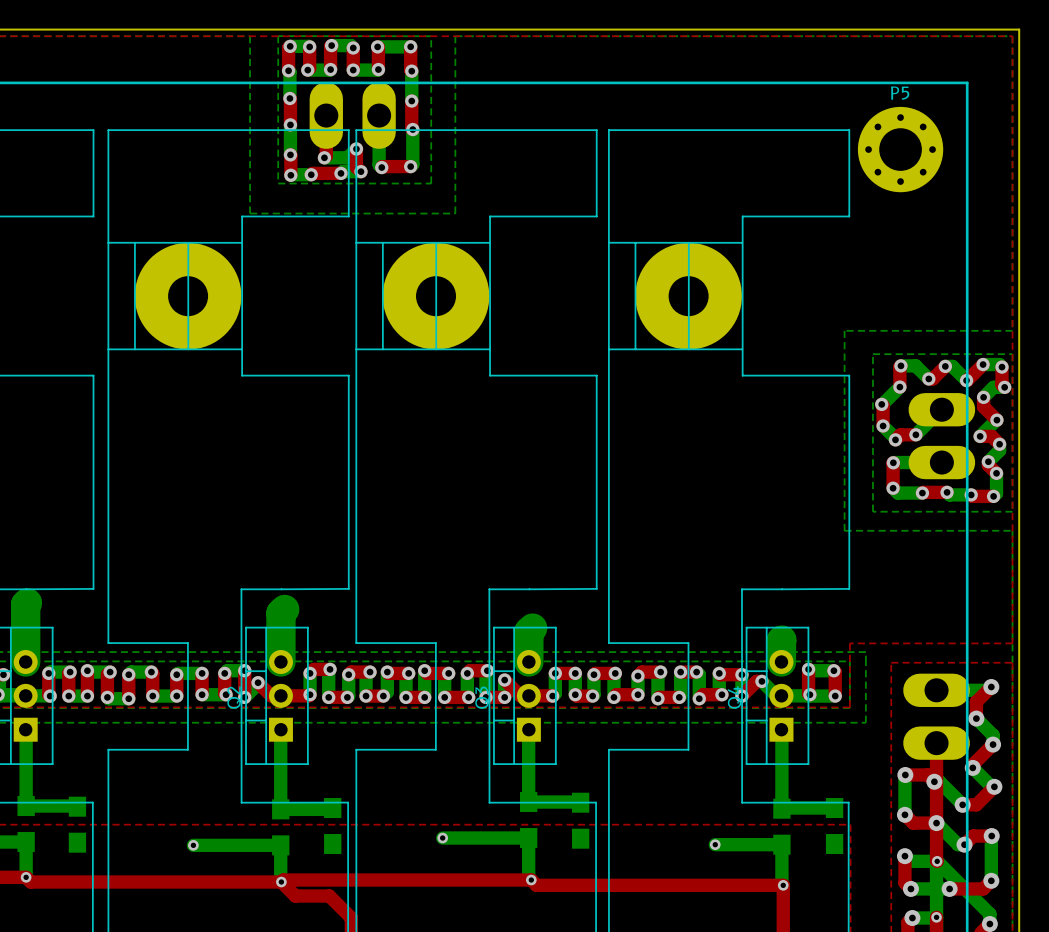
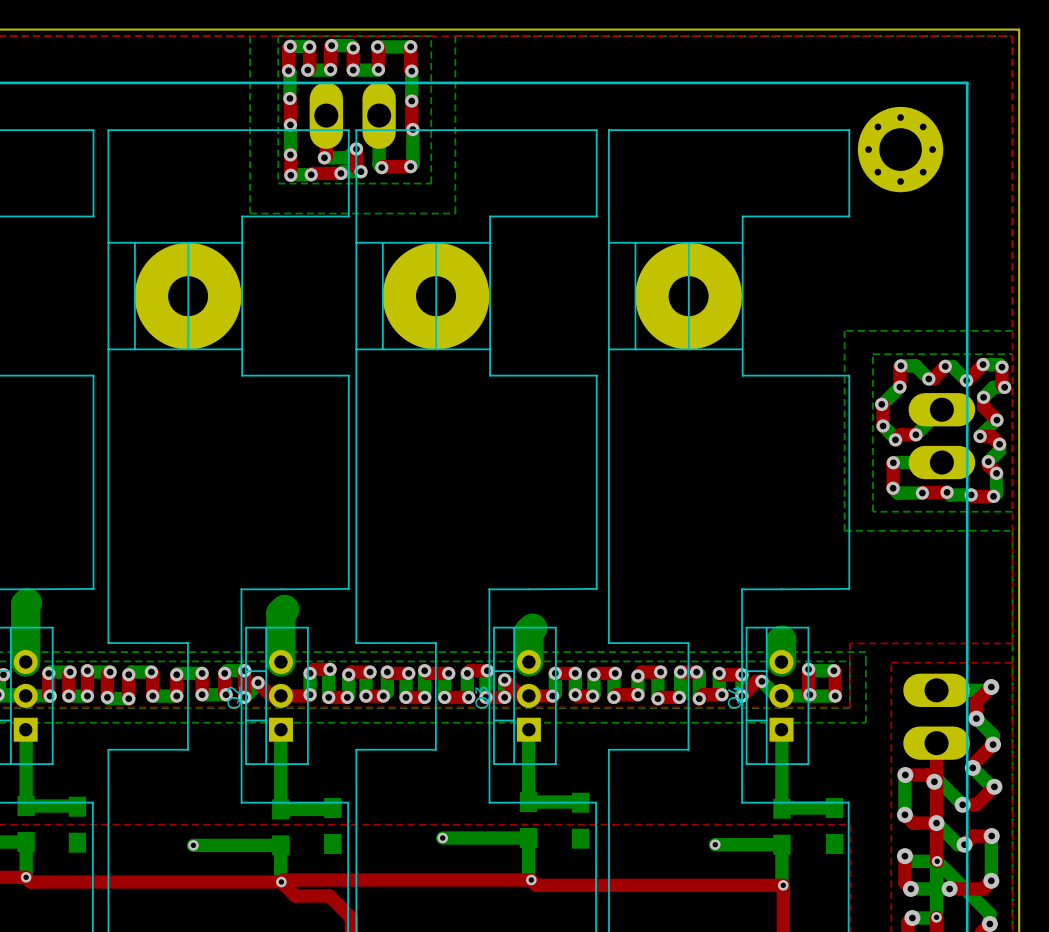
P5 name: P5 (900, 93) -> none

